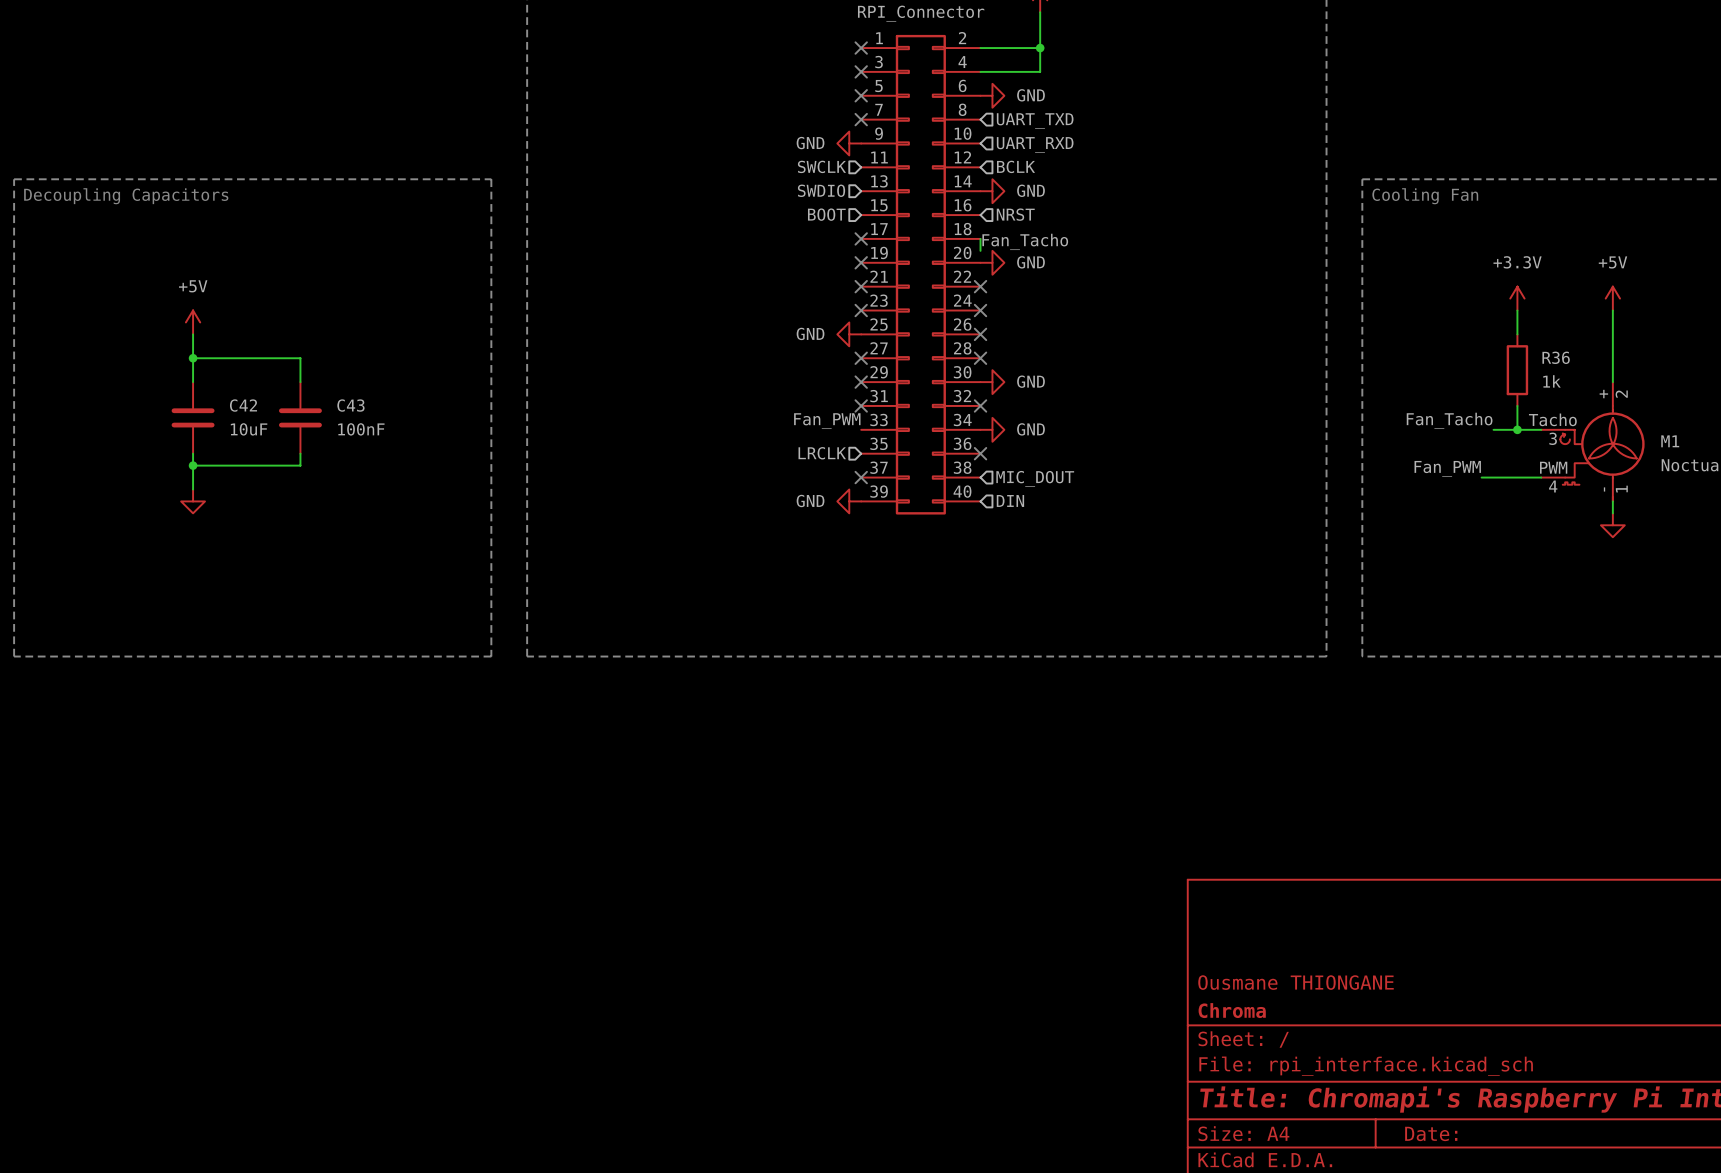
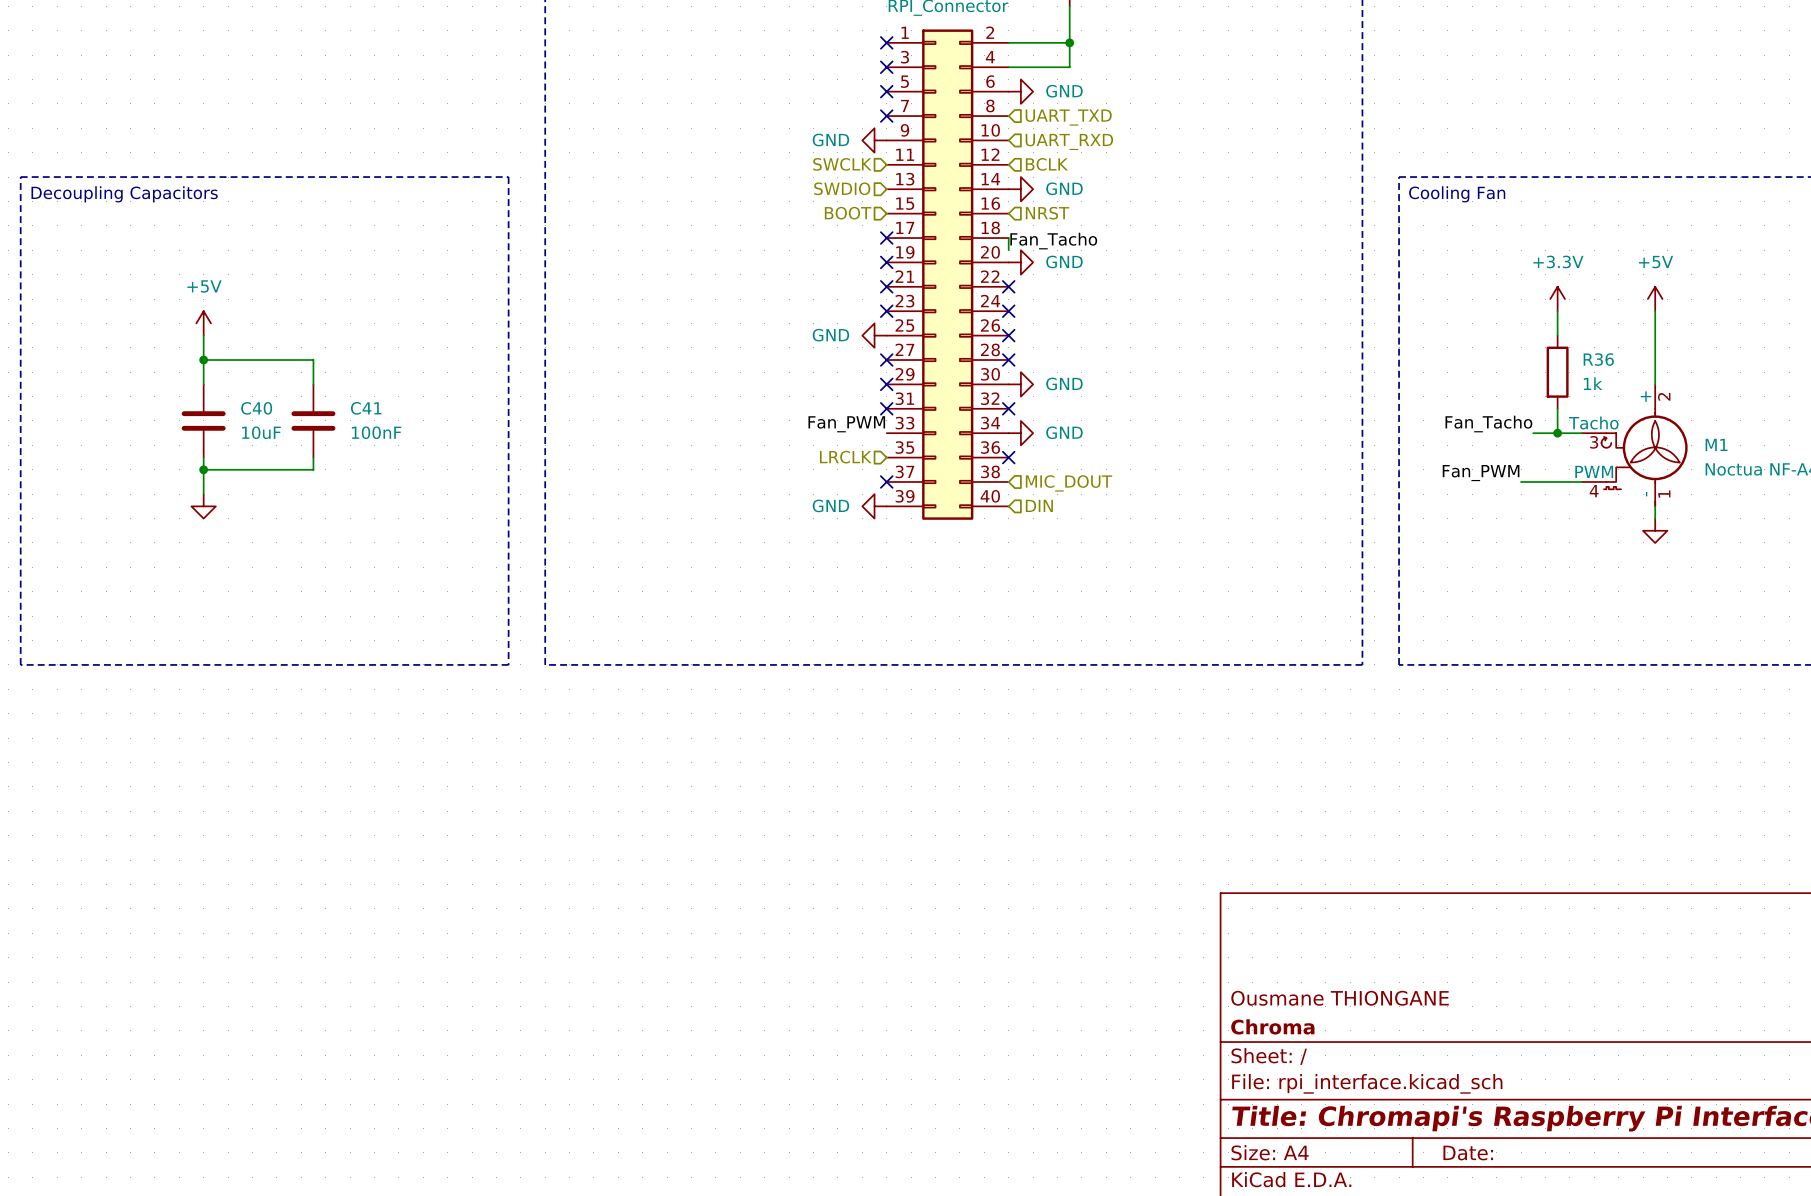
C42 name: C42 (243, 405) -> C40 (256, 408)
C43 name: C43 (350, 405) -> C41 (366, 408)

